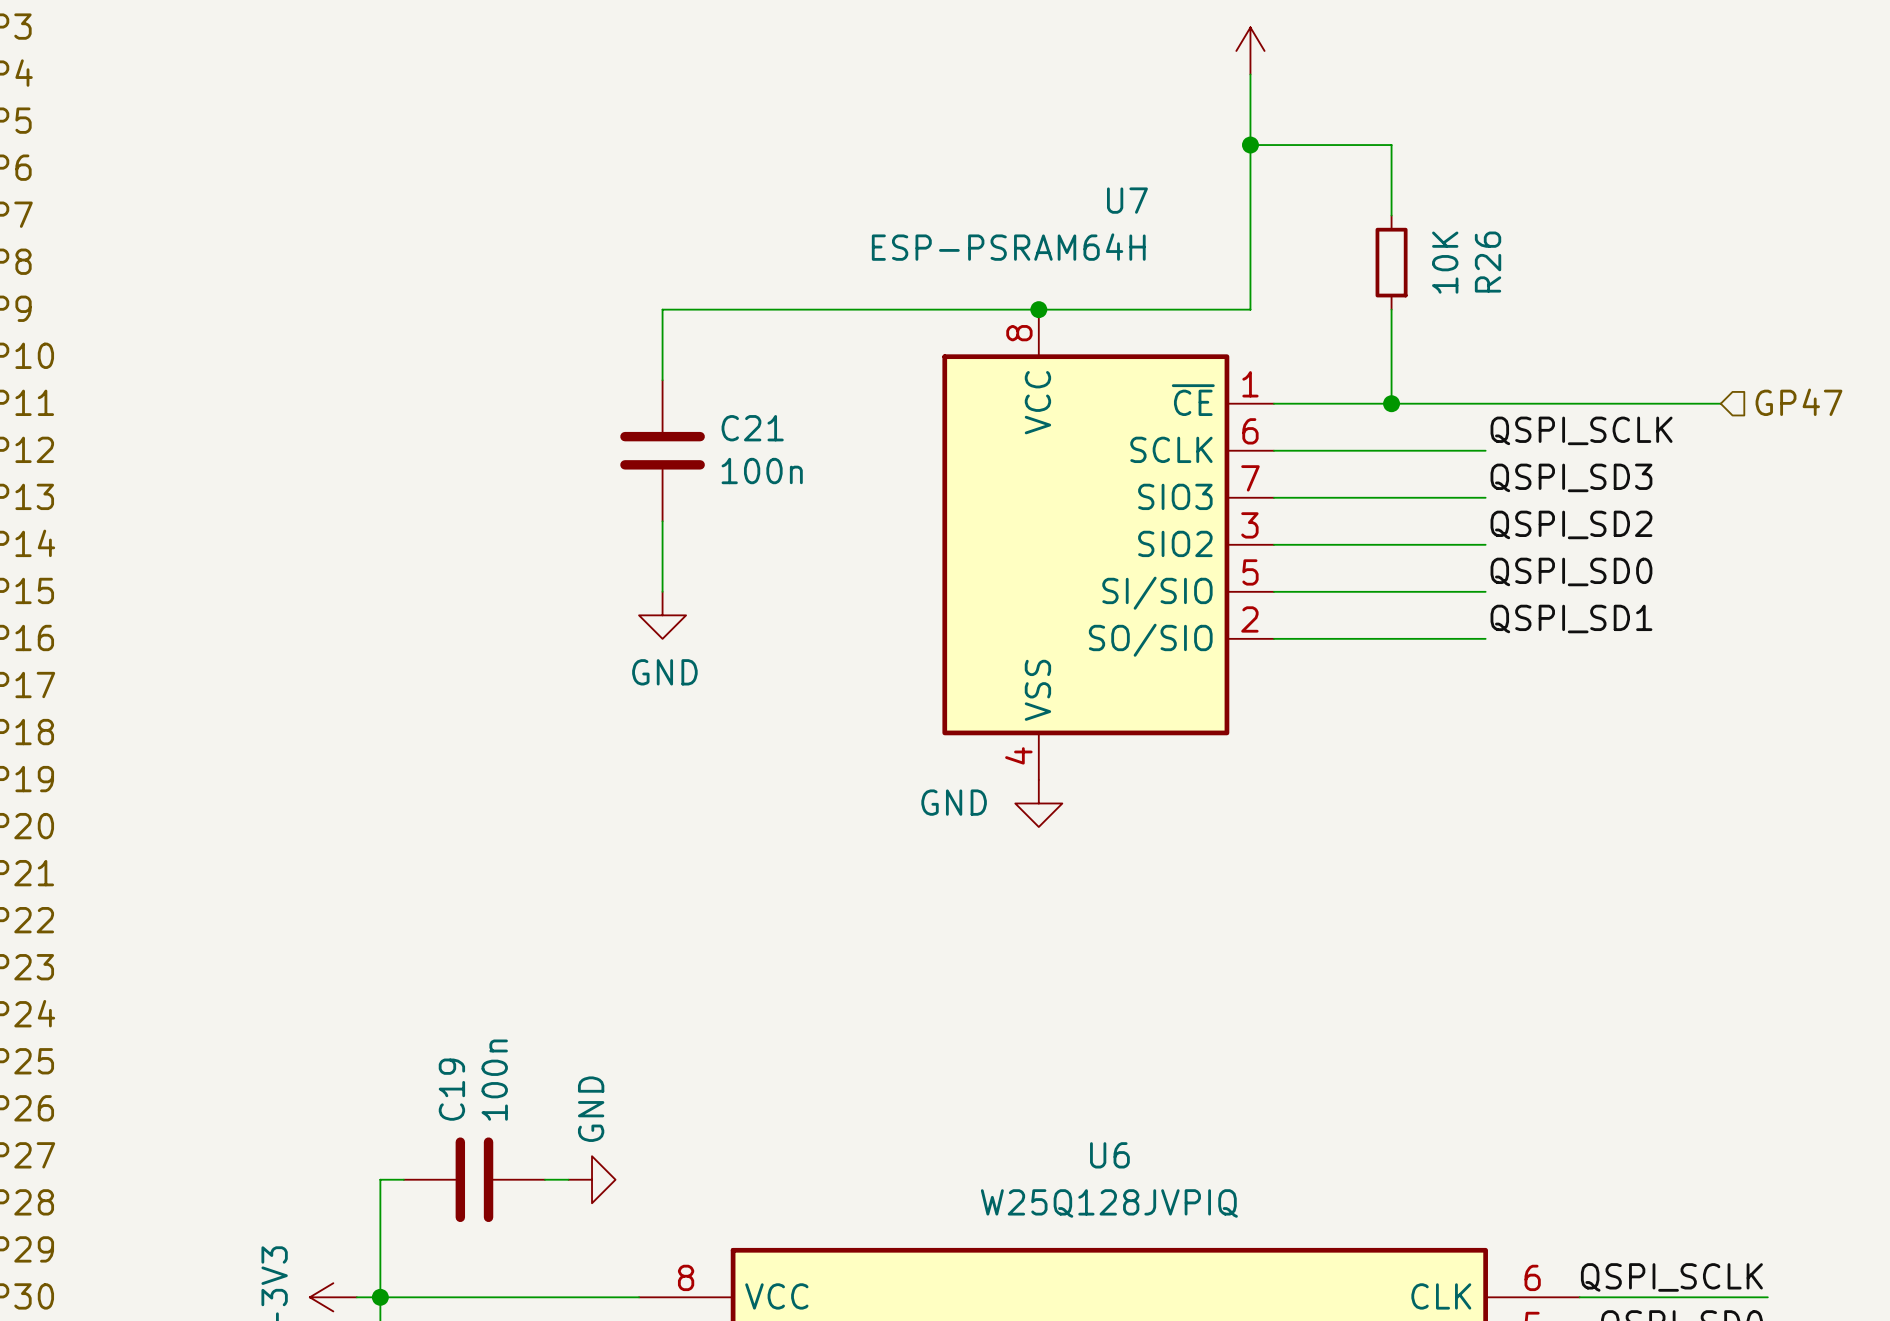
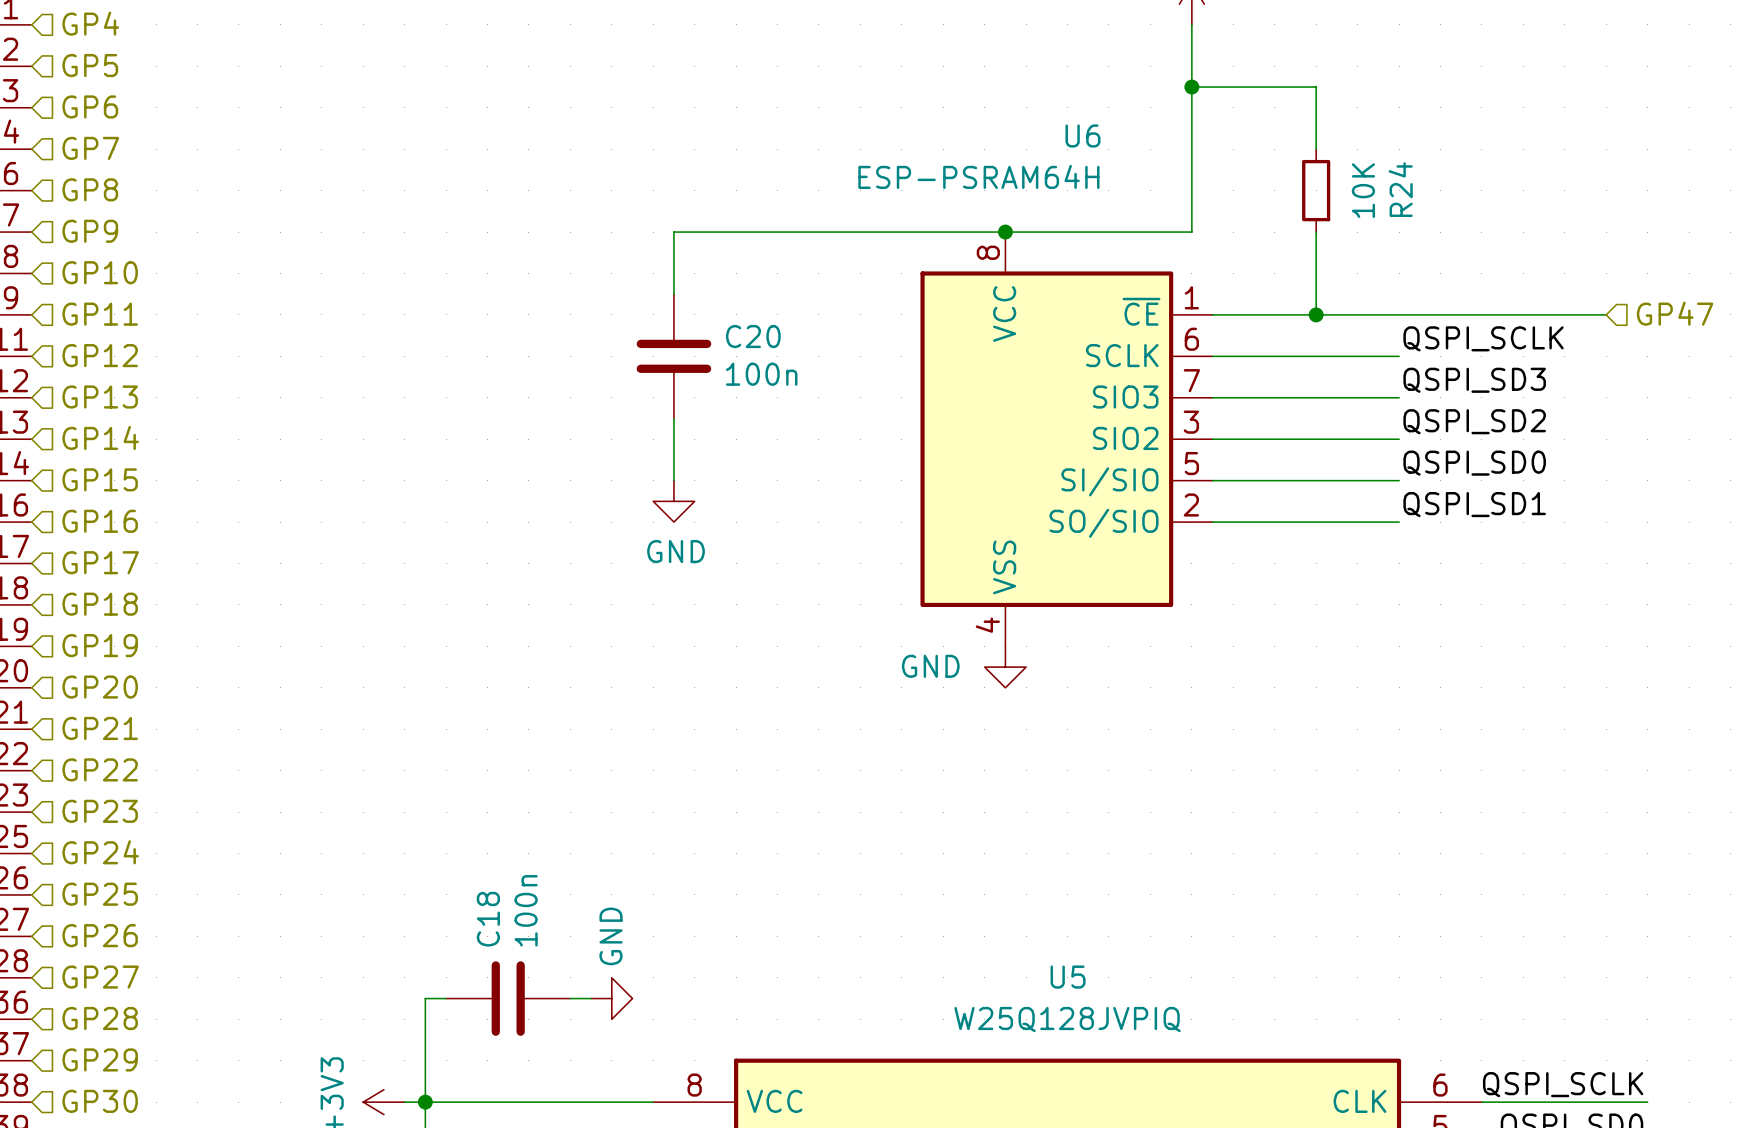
U7 name: U7 (1127, 200) -> U6 (1082, 135)
R26 name: R26 (1488, 262) -> R24 (1400, 189)
C21 name: C21 (752, 428) -> C20 (753, 336)
C19 name: C19 (451, 1089) -> C18 (488, 919)
U6 name: U6 (1109, 1155) -> U5 (1068, 977)

